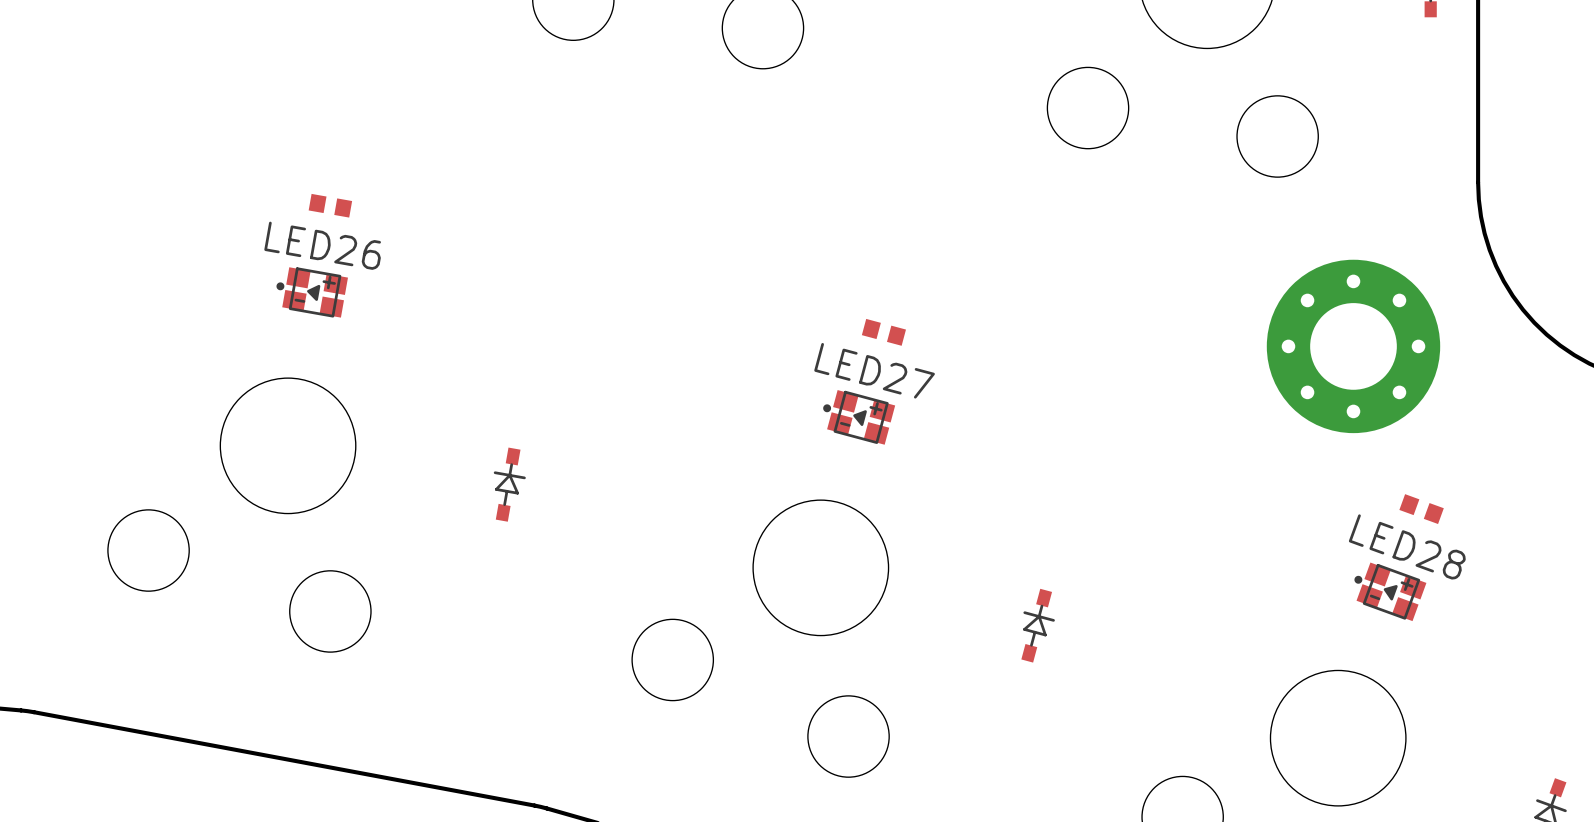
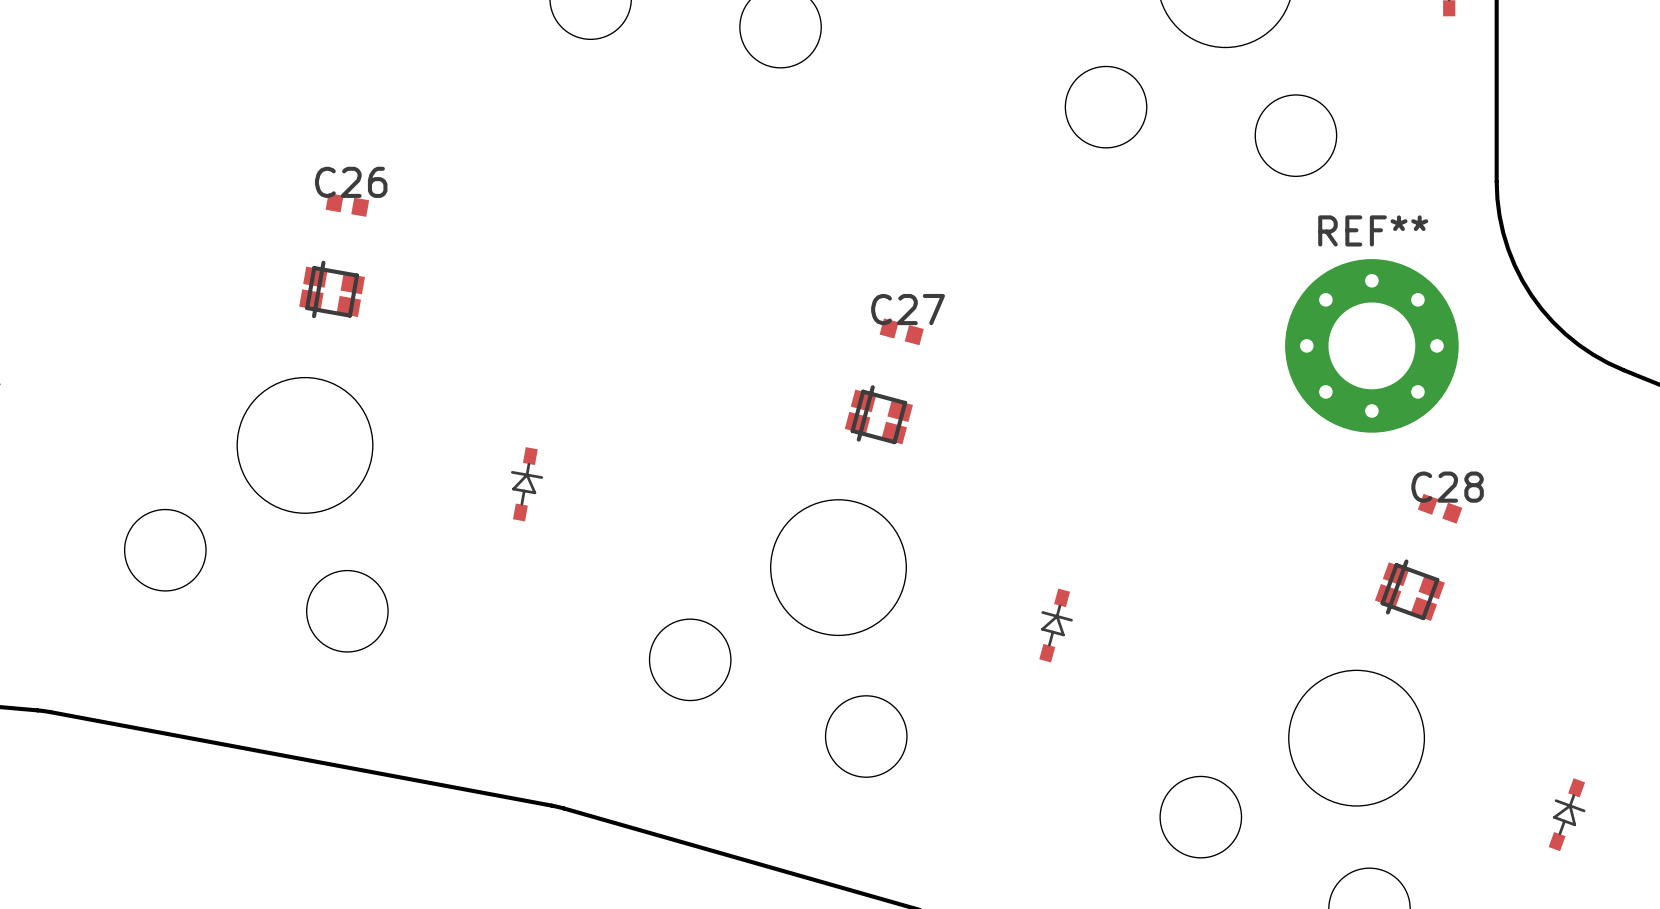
C26 name: none -> C26 (351, 182)
REF** name: none -> REF** (1373, 230)
part: none -> (332, 289)
LED26: (312, 292) -> none
C27 name: none -> C27 (908, 309)
part: none -> (878, 414)
LED27: (859, 417) -> none
C28 name: none -> C28 (1447, 487)
part: none -> (1409, 590)
LED28: (1390, 591) -> none

